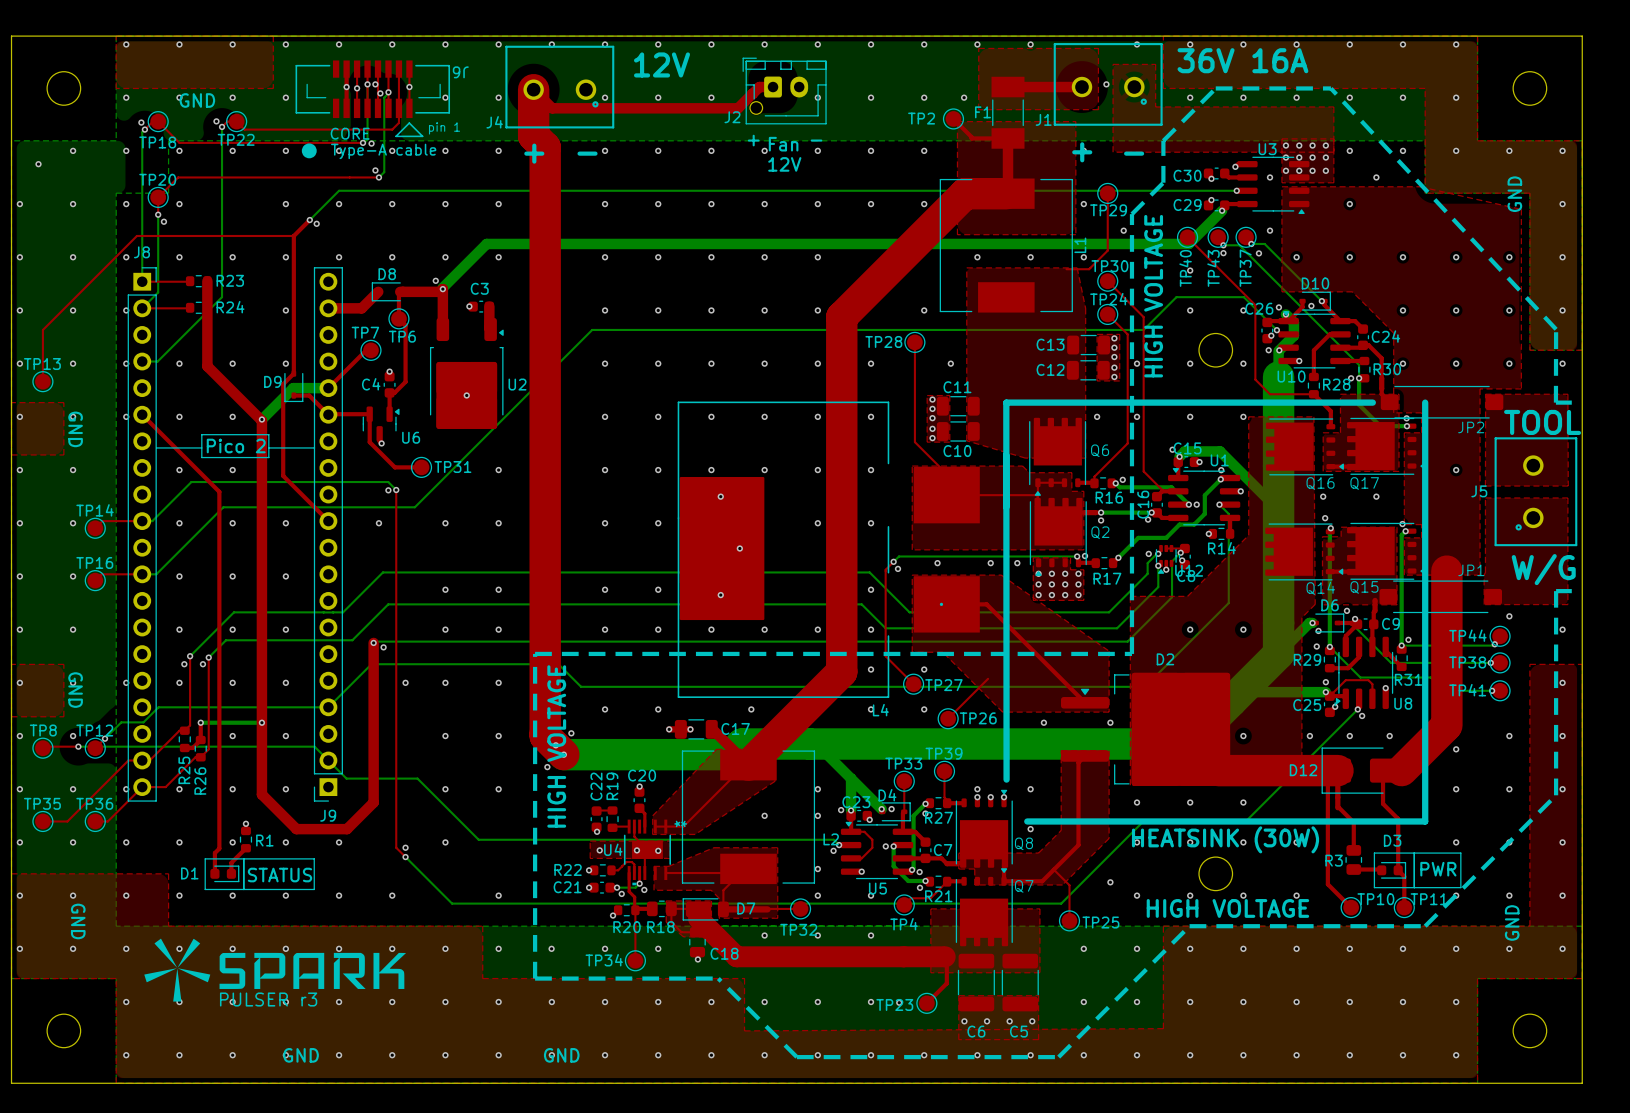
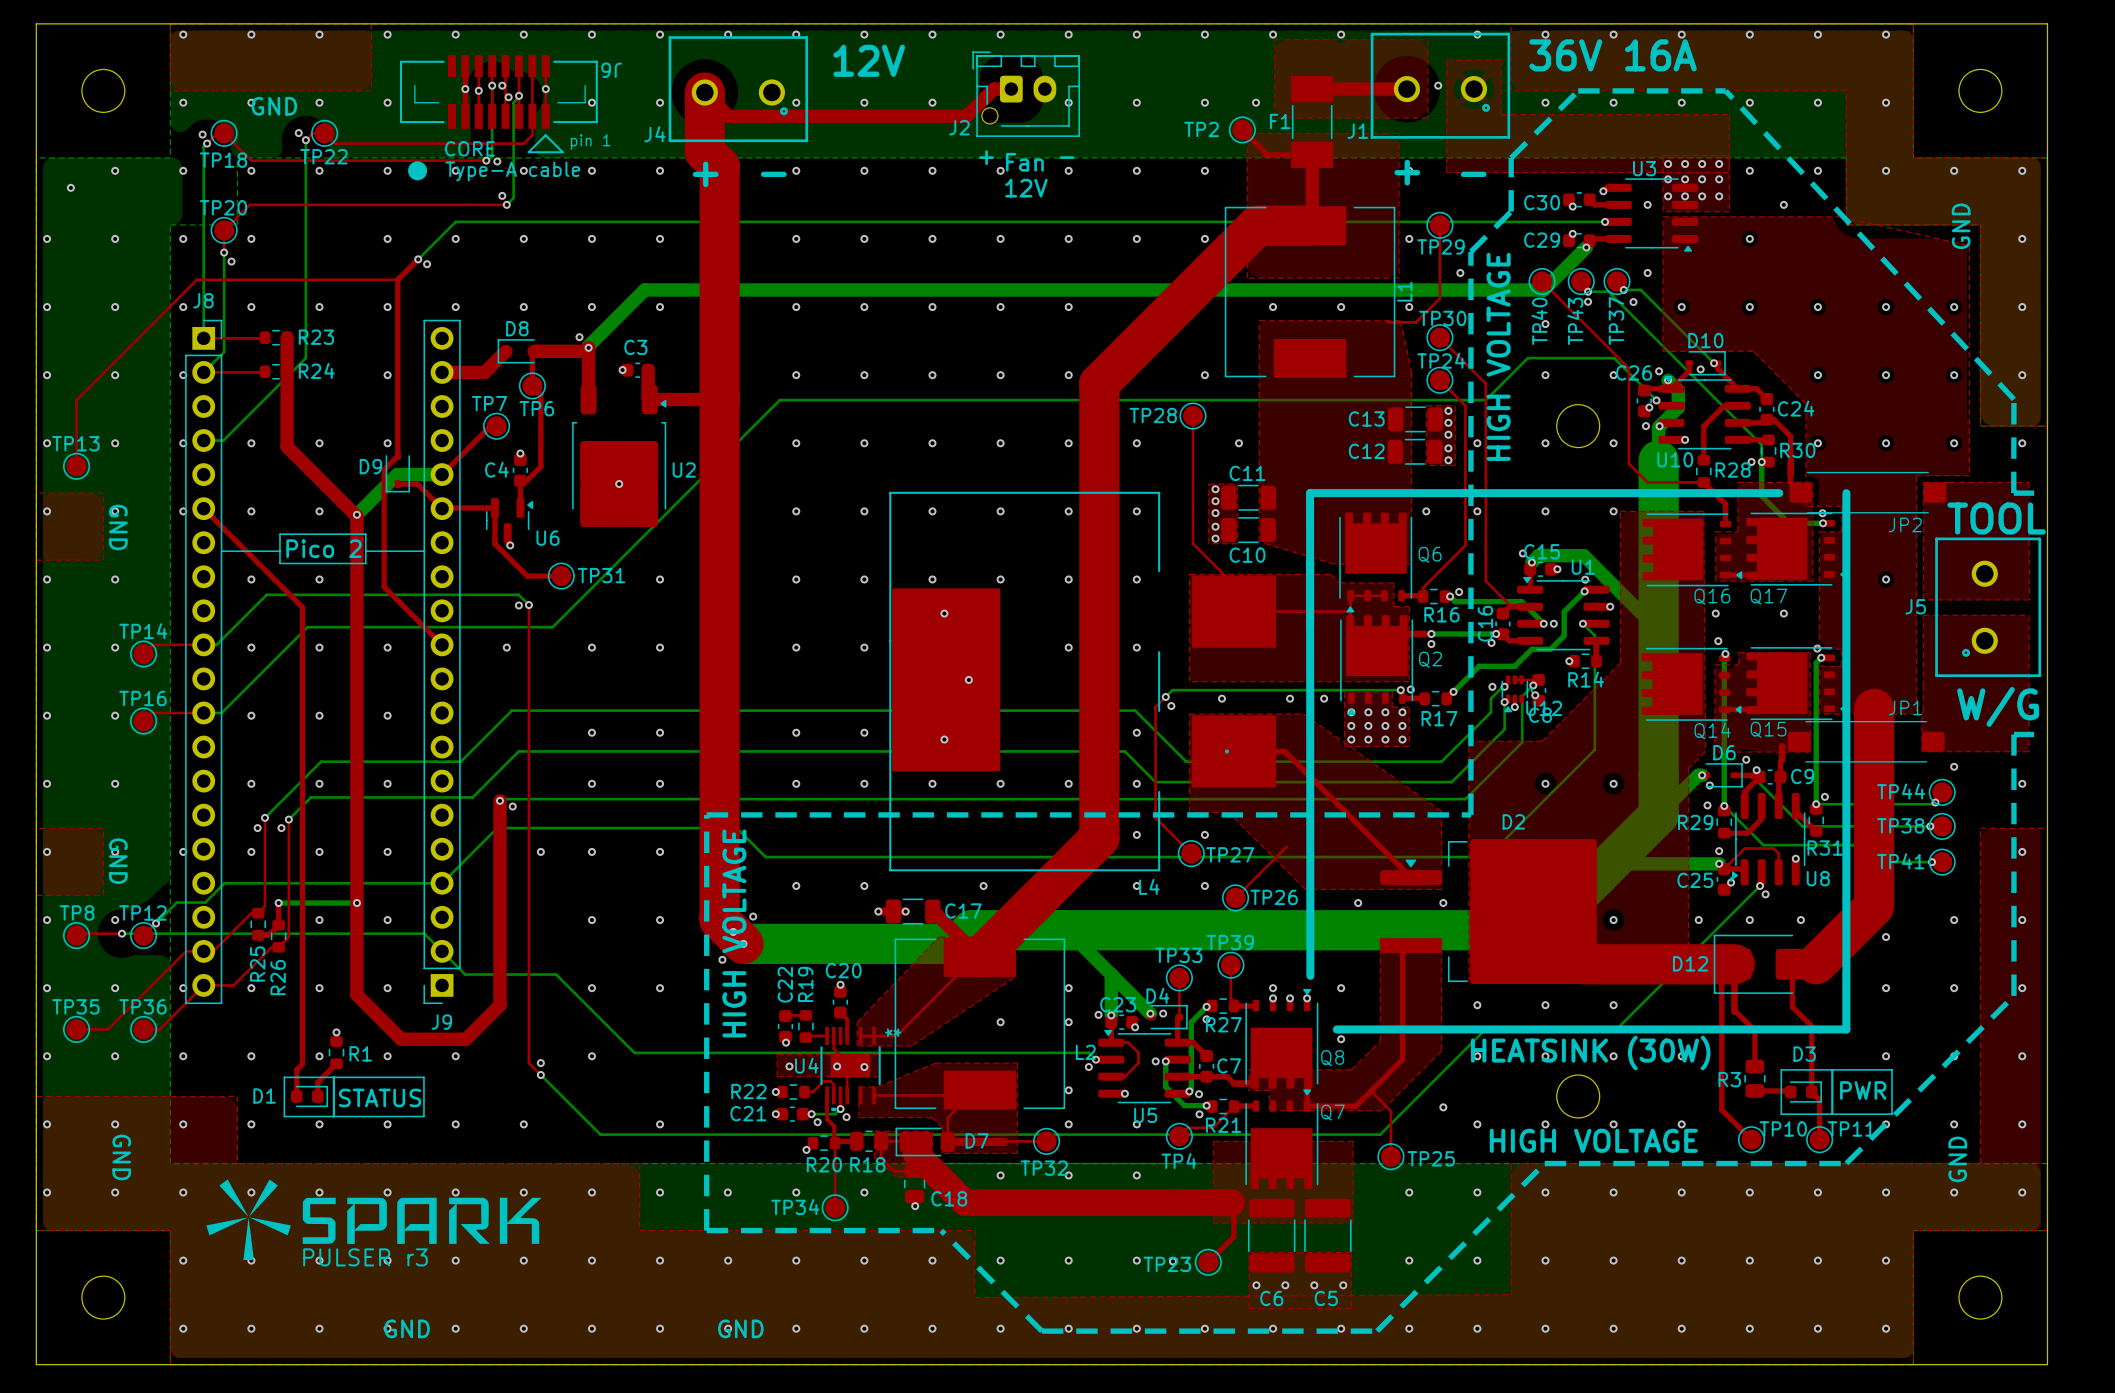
top track: none -> (719, 398) (649, 399)

